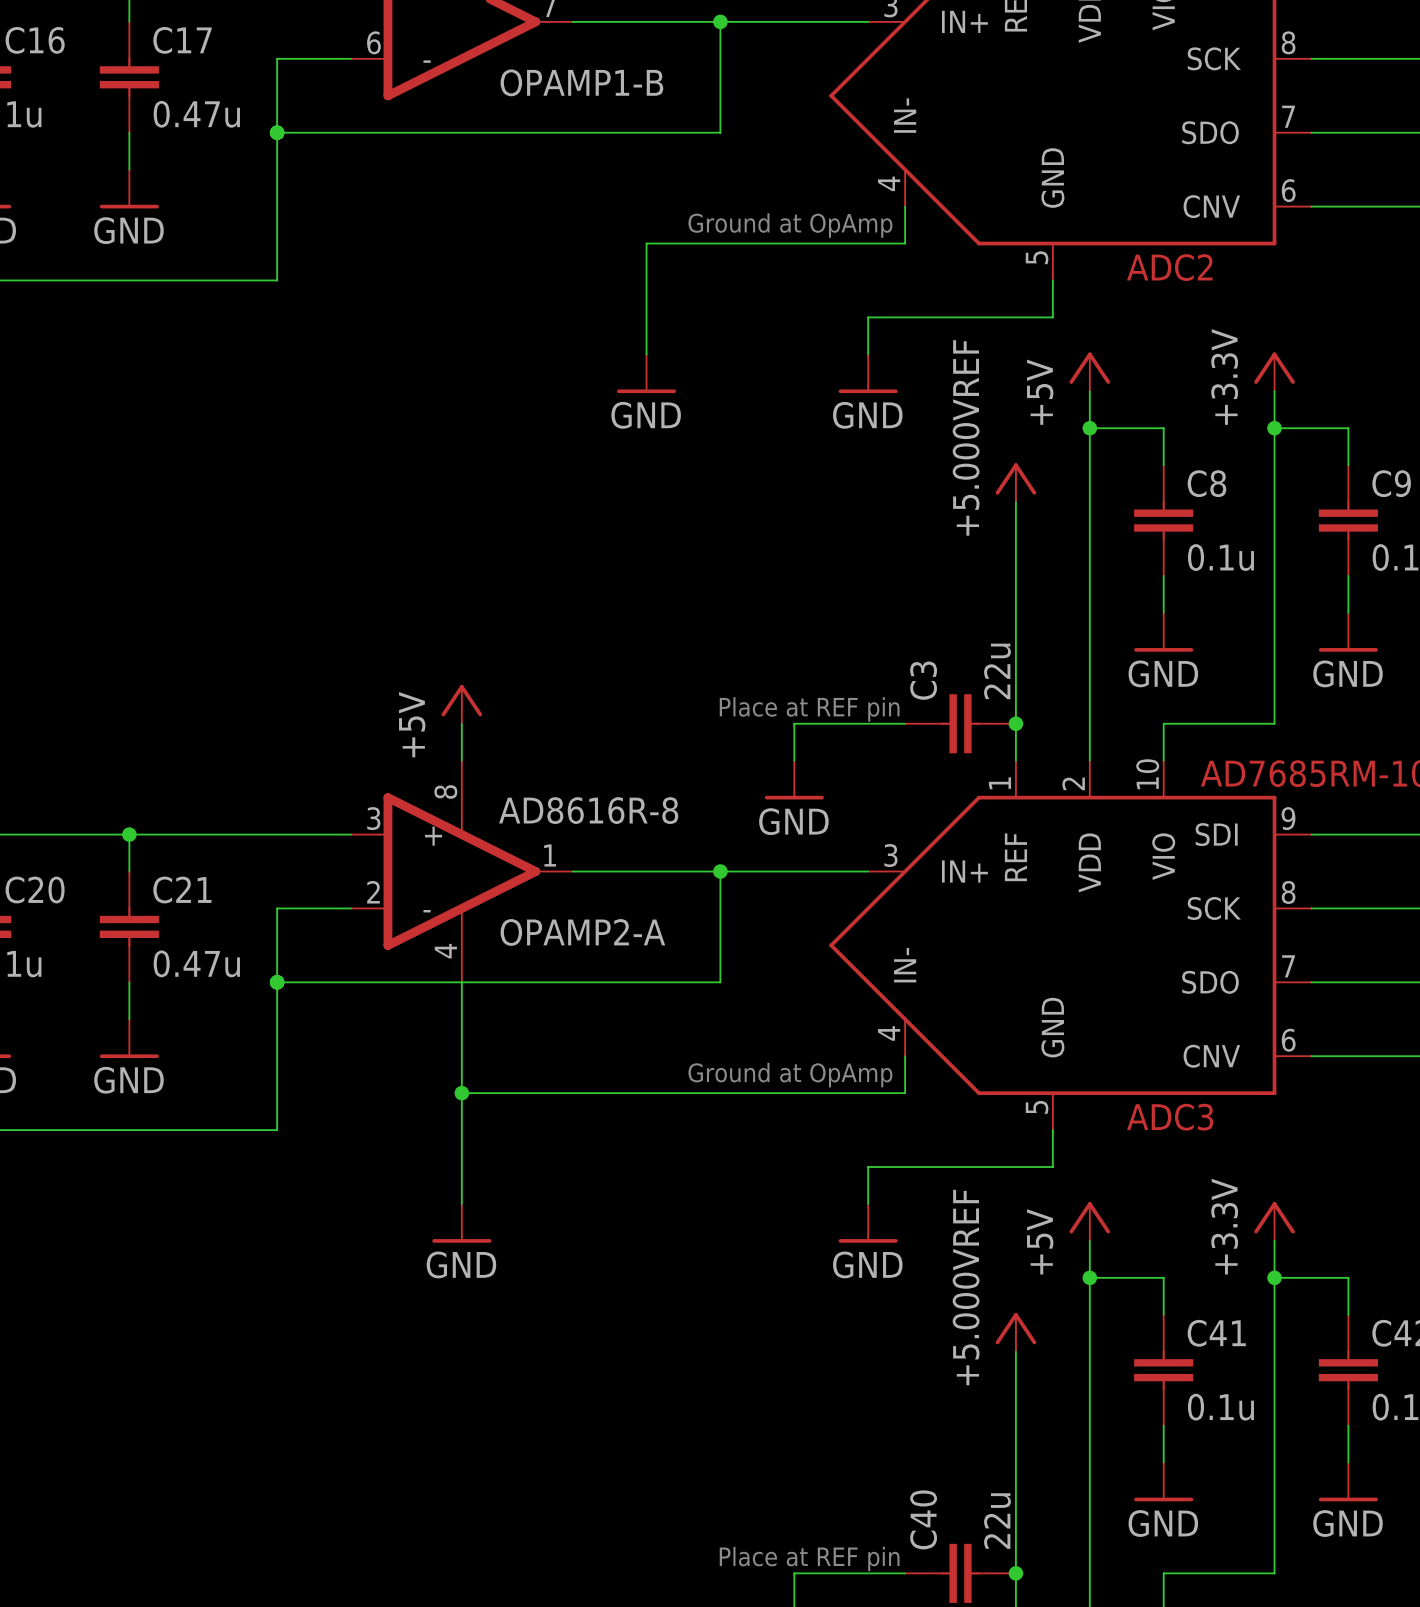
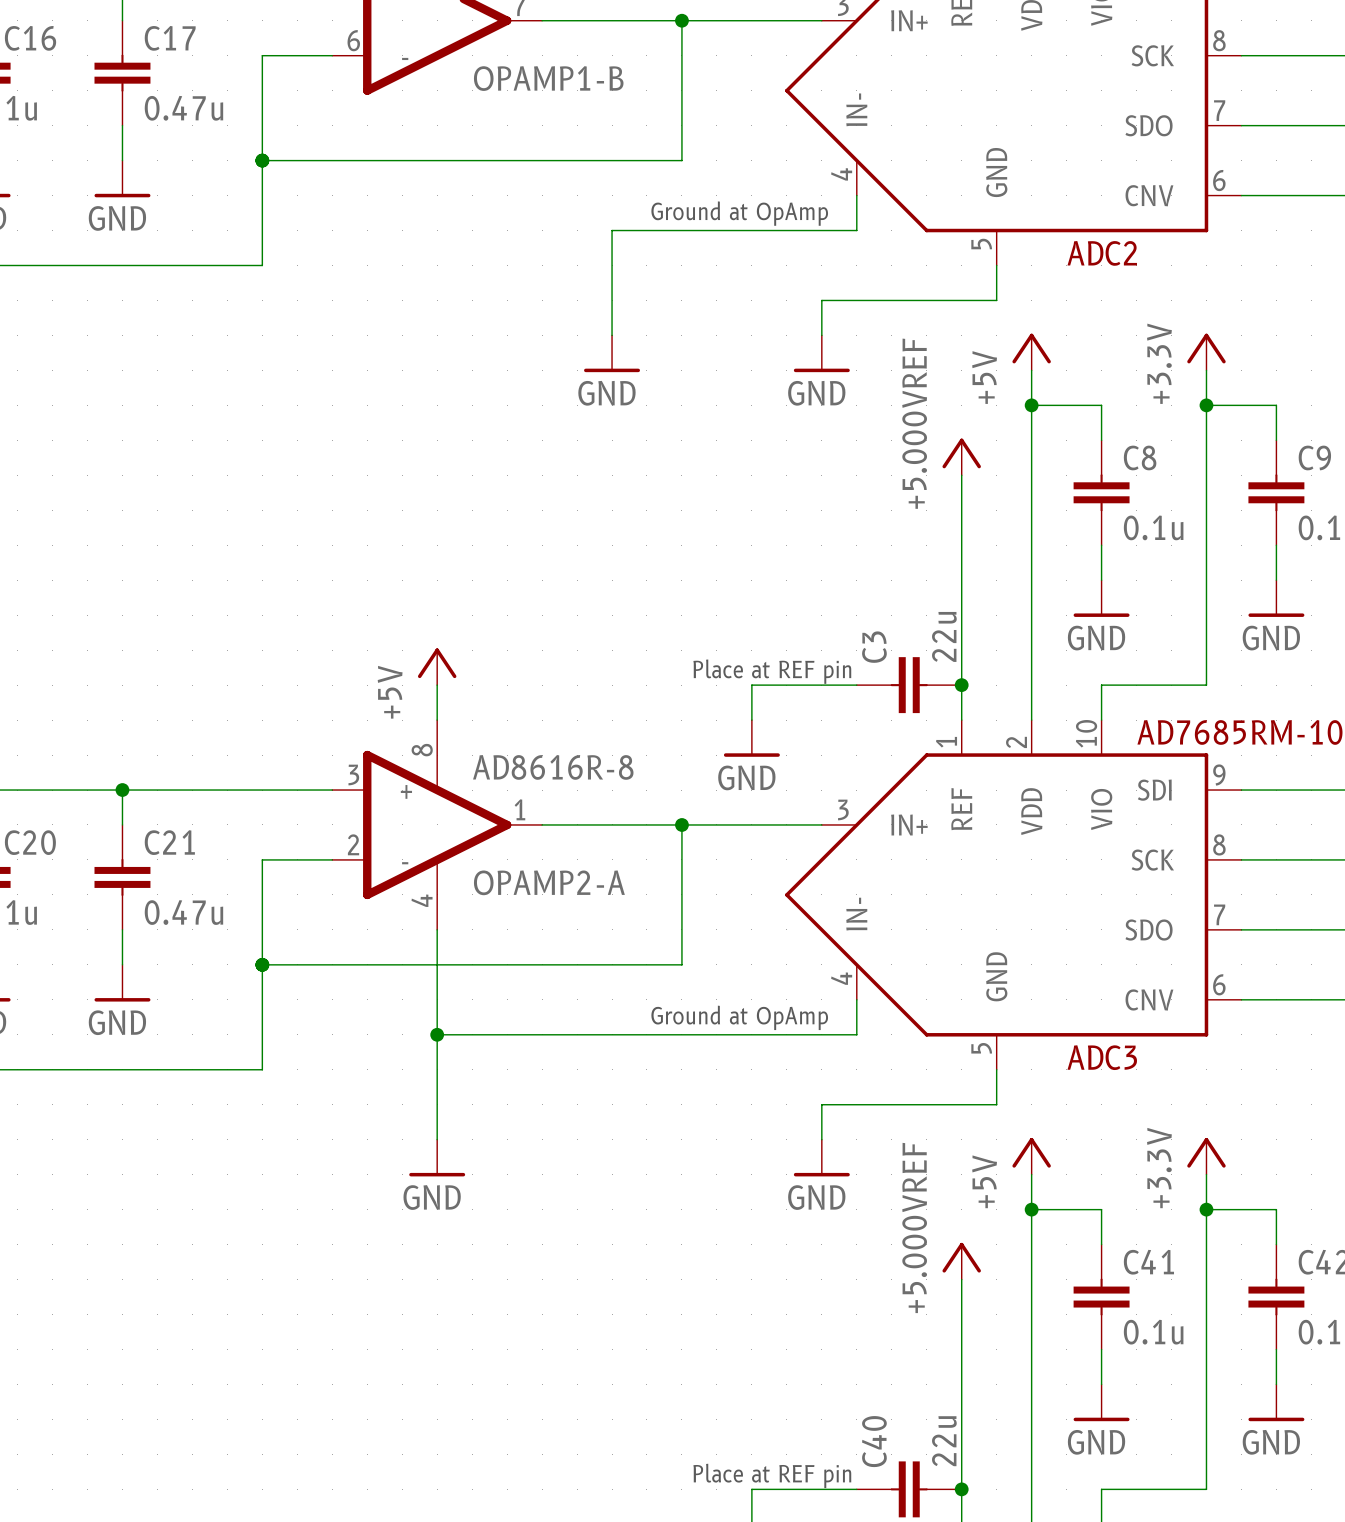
wire: (277, 132) (720, 132) -> (262, 160) (681, 160) (681, 125)
junction position: (277, 132) -> (262, 160)
wire: (277, 982) (720, 982) -> (262, 964) (681, 964) (681, 929)
junction position: (277, 982) -> (262, 964)

